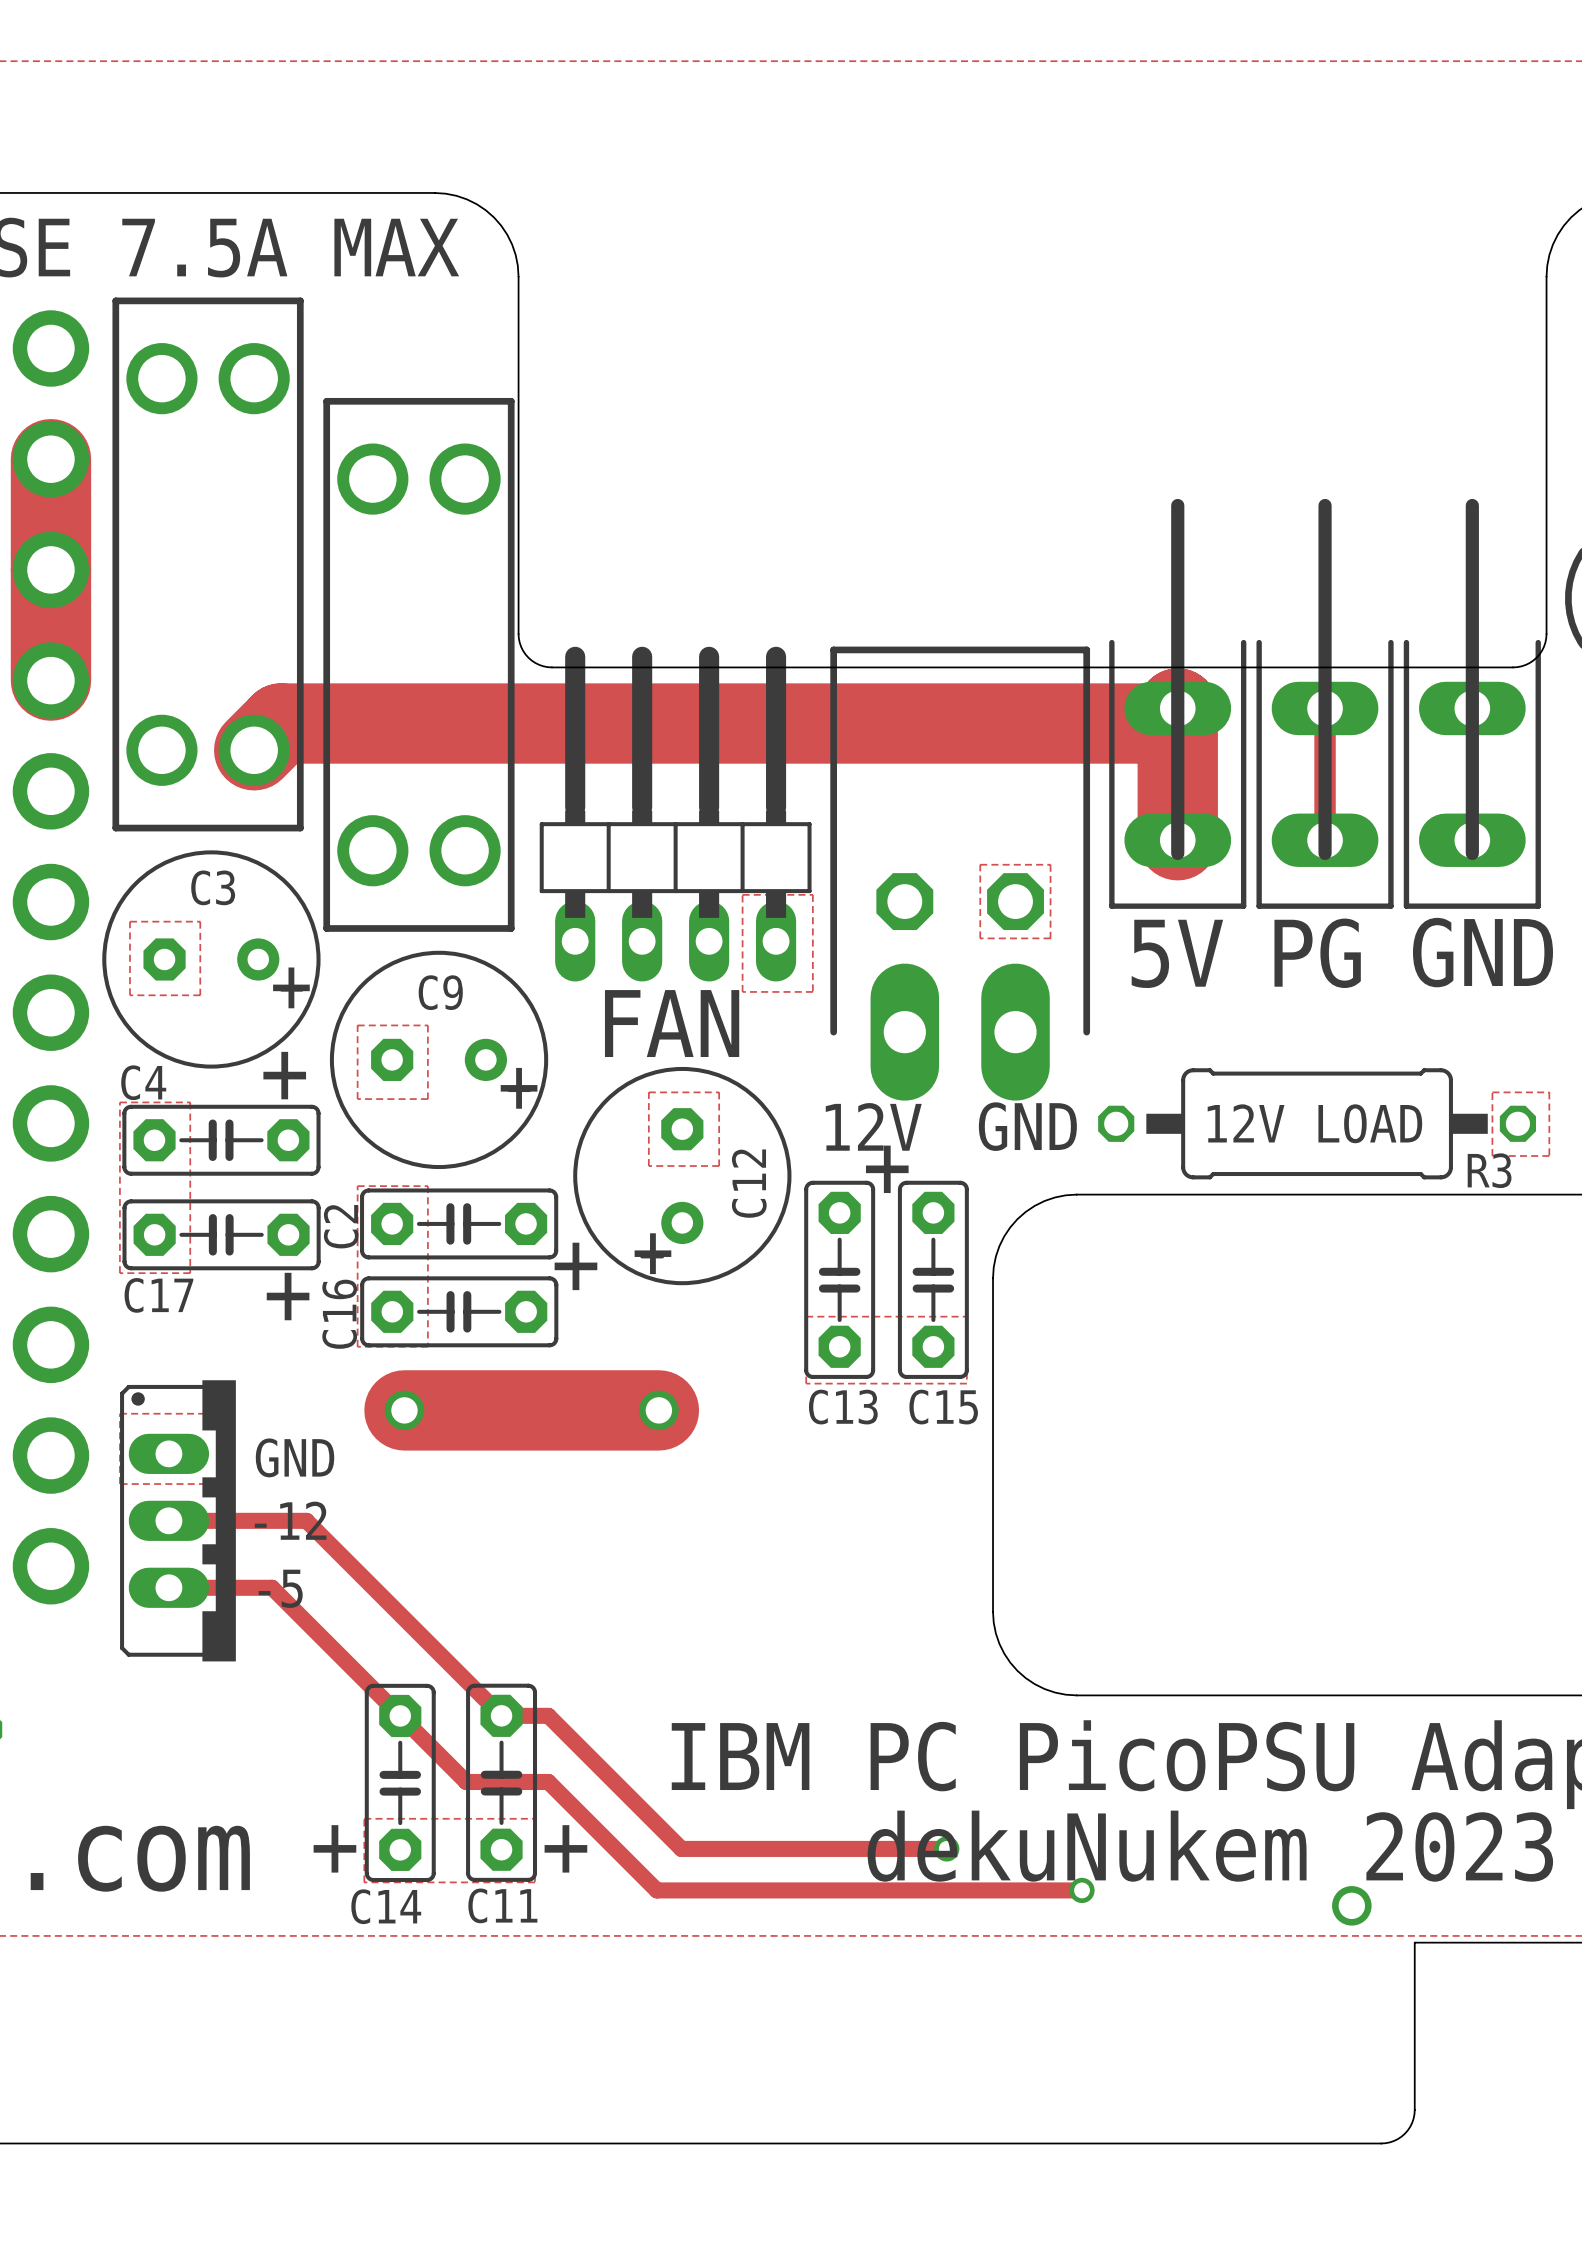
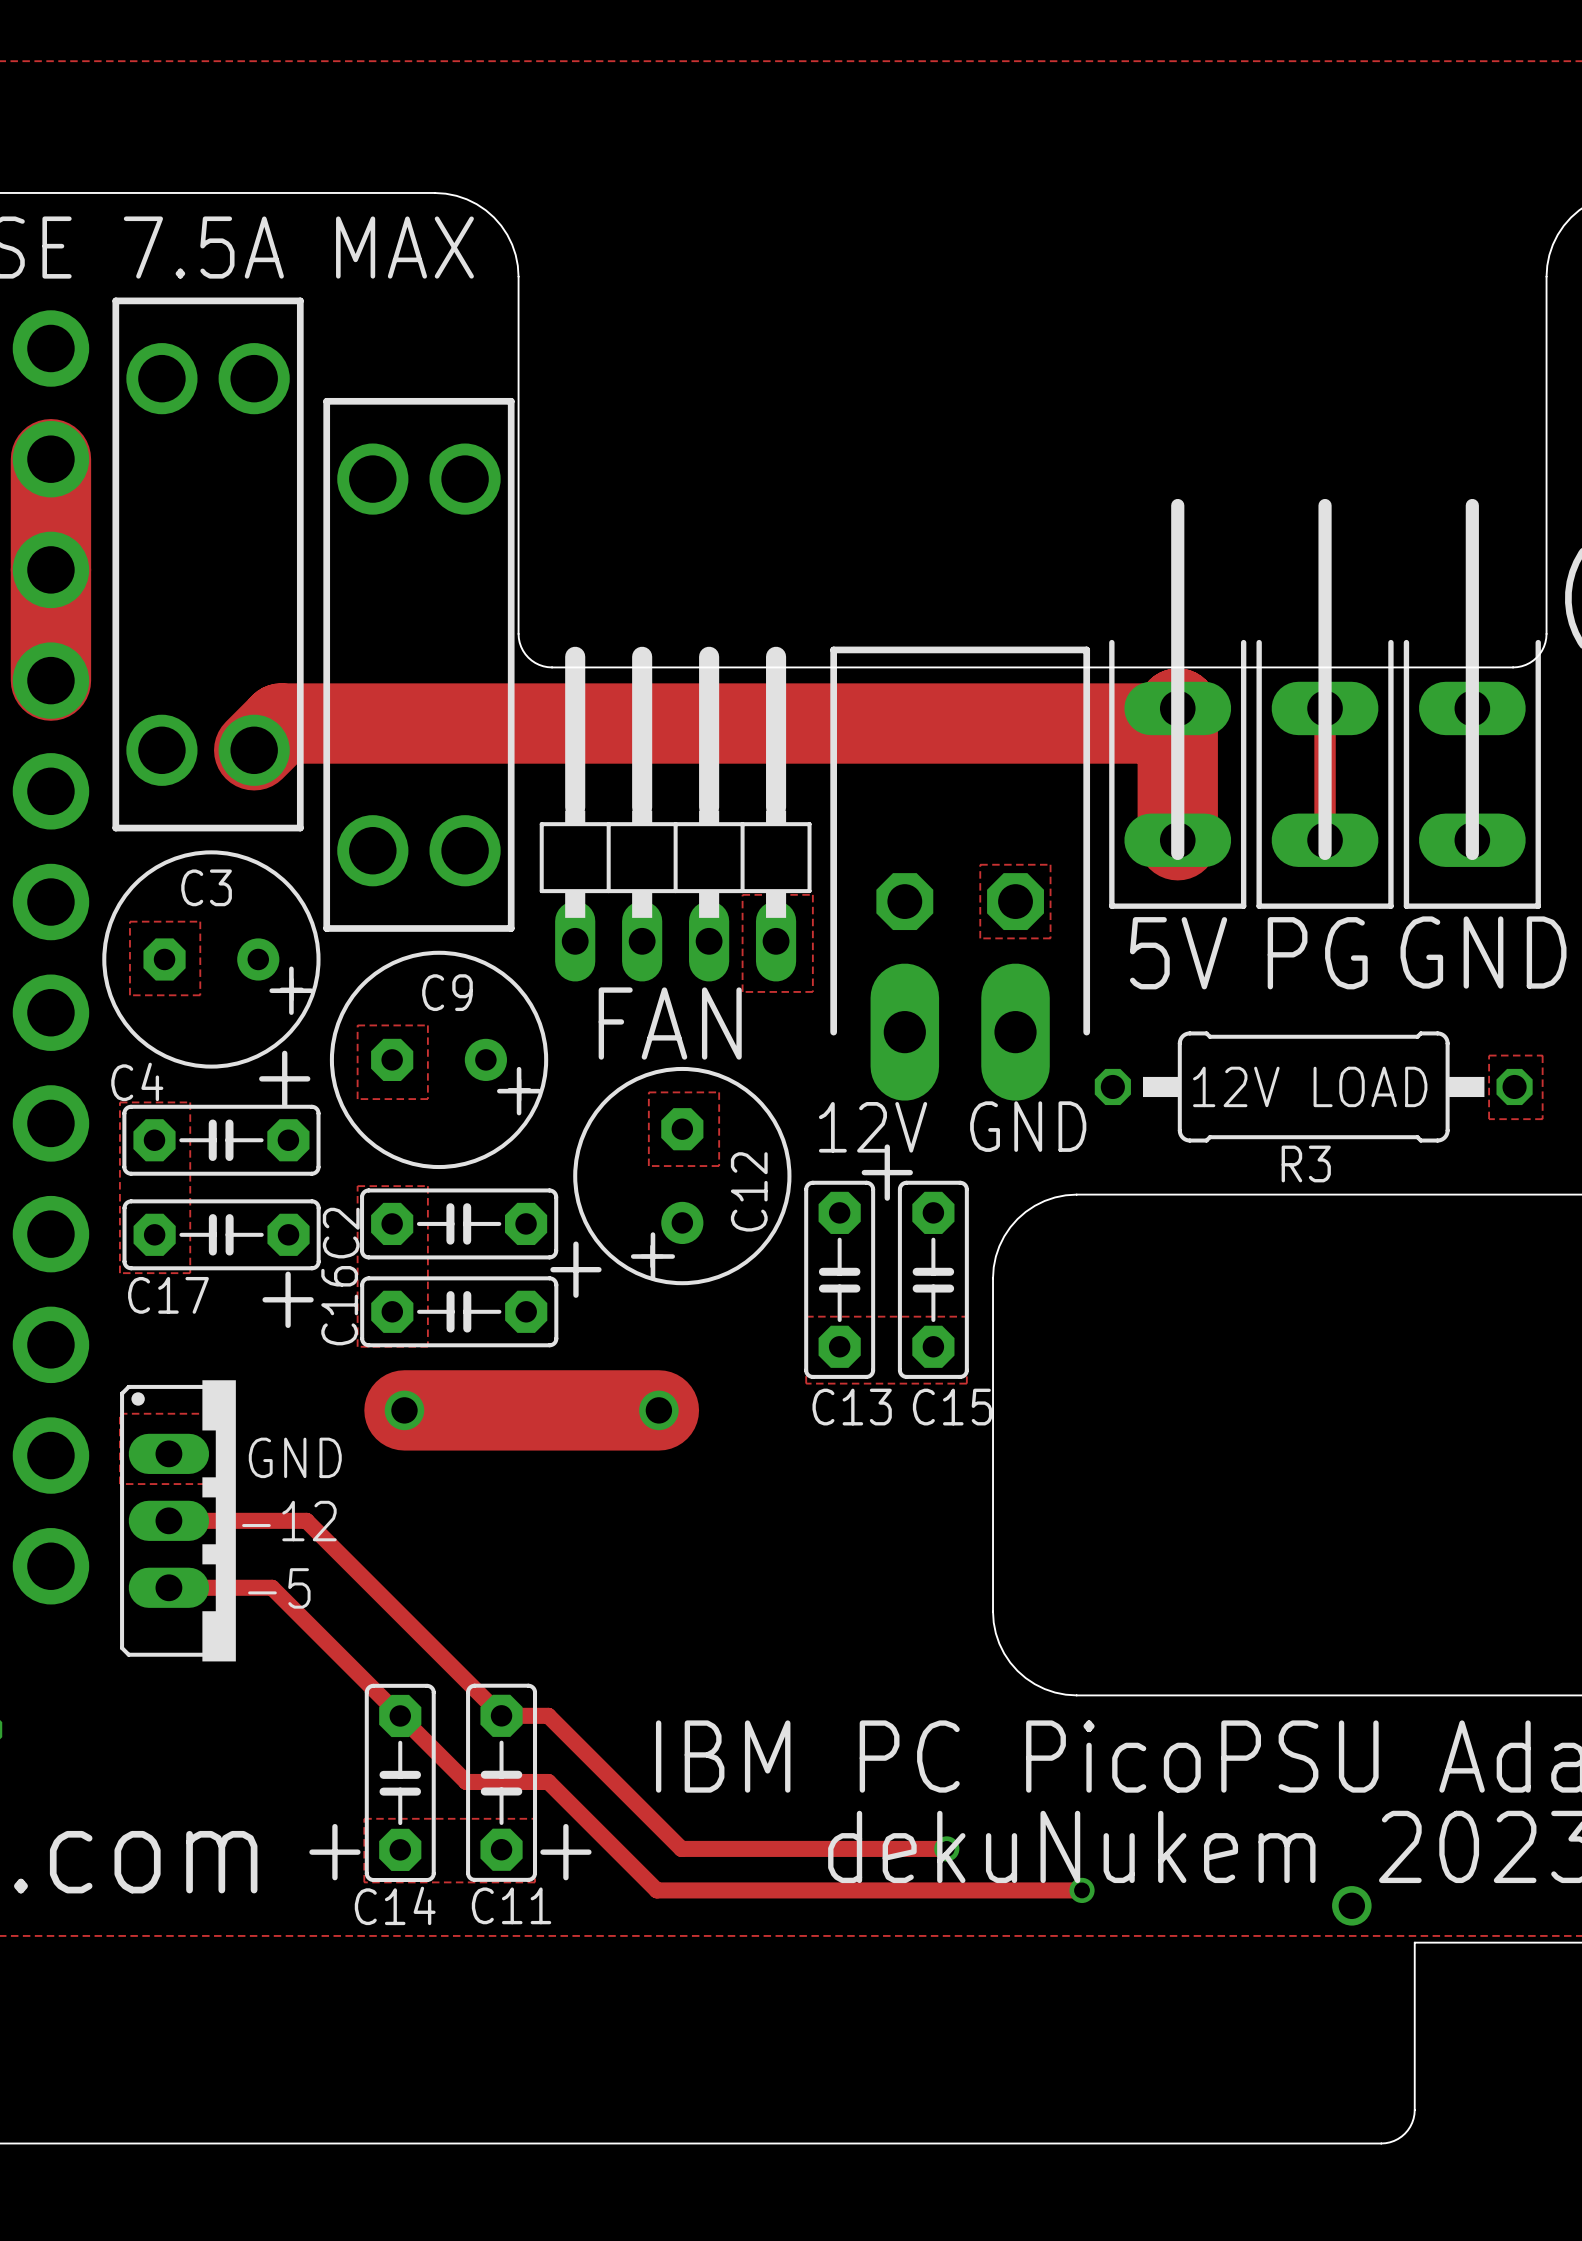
zone outline: none -> (1489, 1055) (1542, 1055) (1542, 1119) (1489, 1119) (1489, 1055)
zone outline: (1492, 1092) (1549, 1092) (1549, 1155) (1492, 1155) (1492, 1092) -> none
text position: 12V LOAD (1314, 1123) -> 12V LOAD (1310, 1086)
R3 position: (1317, 1123) -> (1313, 1086)
R3 name position: R3 (1489, 1170) -> R3 (1306, 1163)

